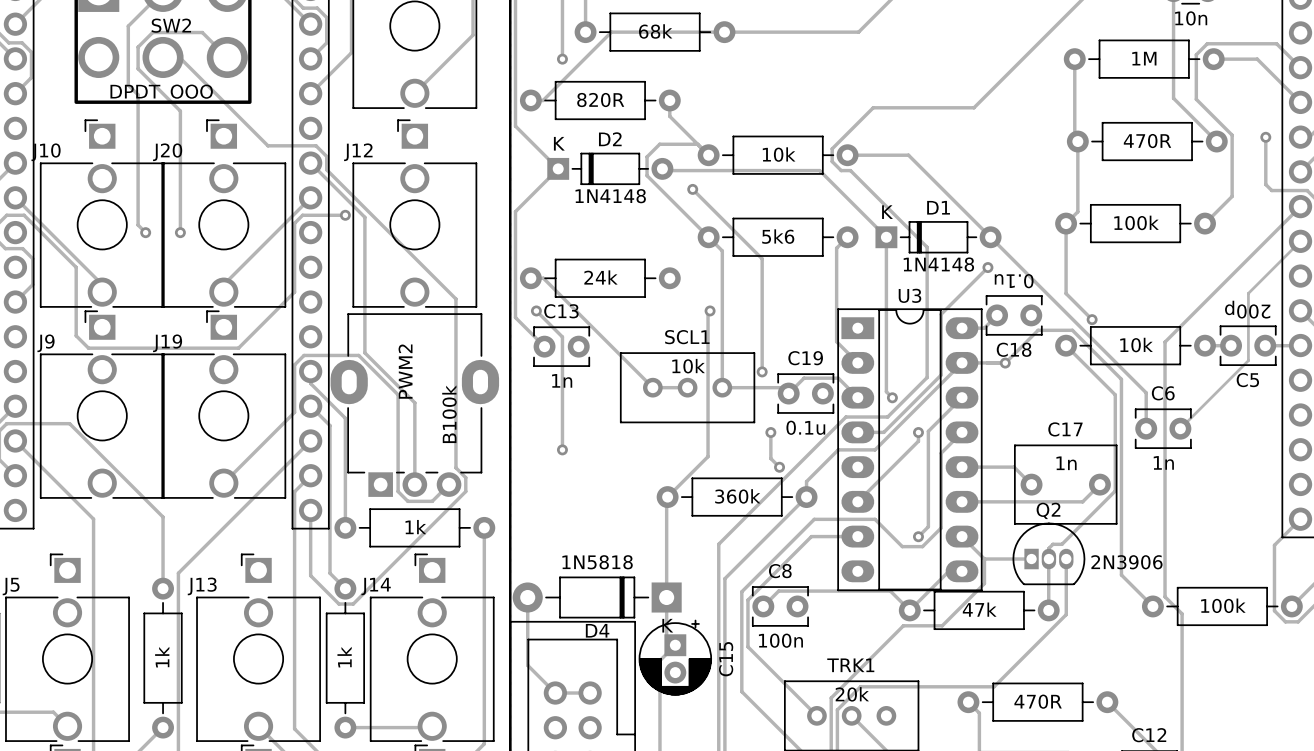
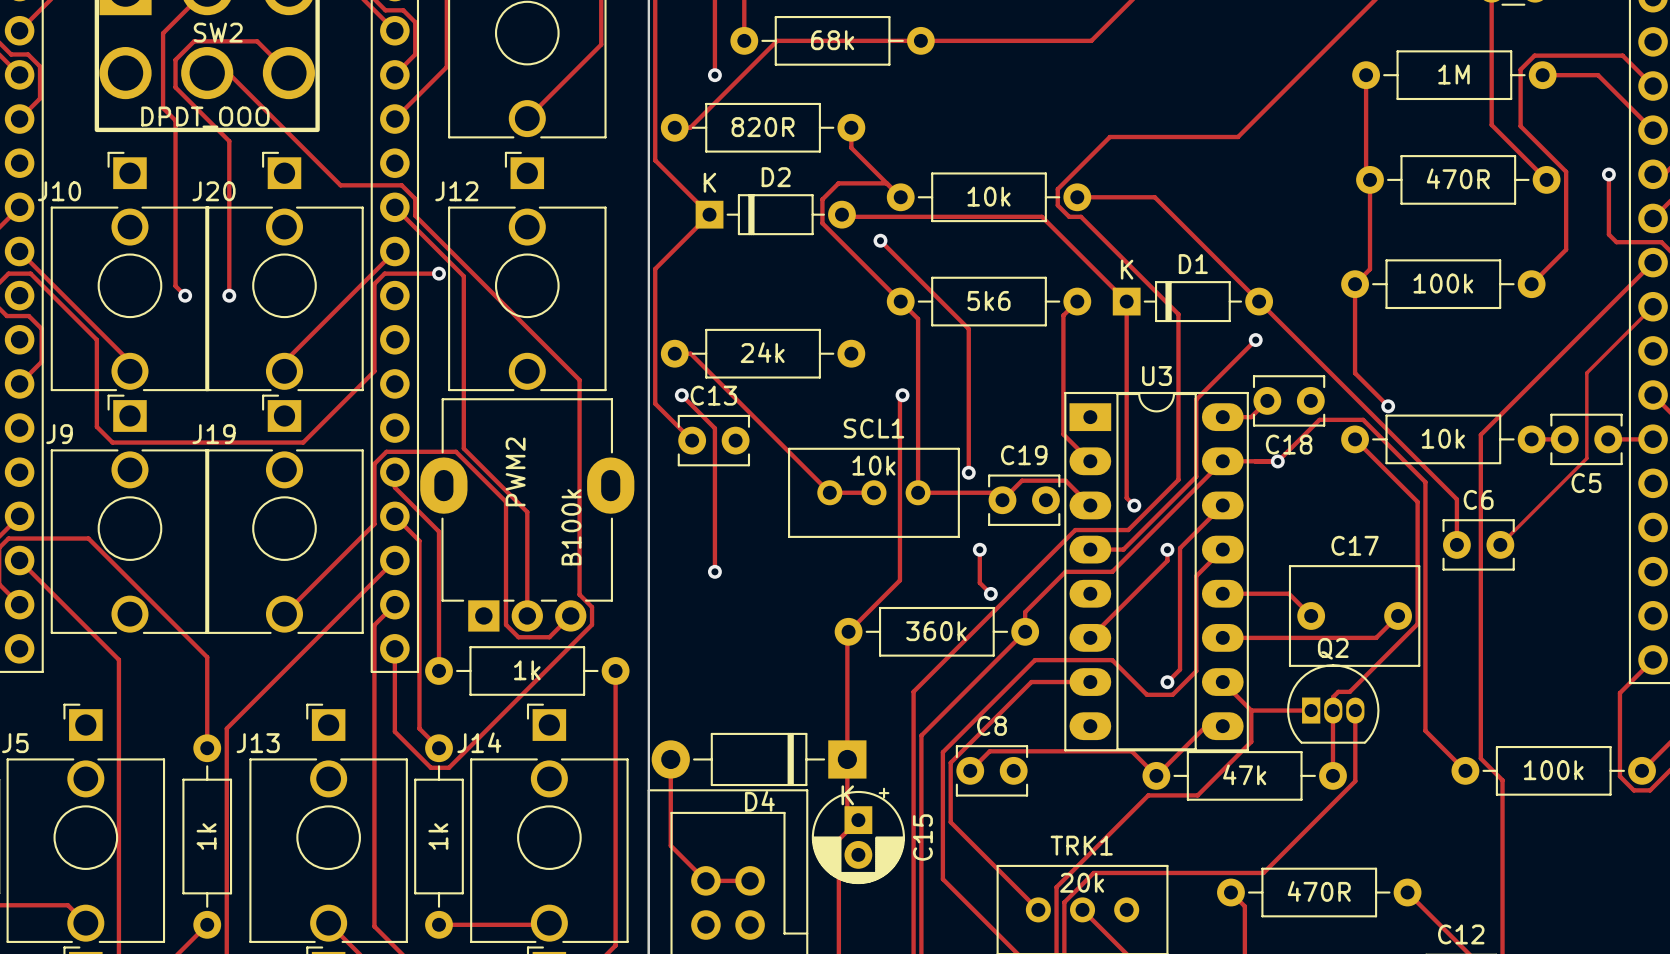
part value: 10n (1191, 18) -> none
D2 value: 1N4148 (610, 196) -> none
D1 value: 1N4148 (938, 264) -> none
C18 value: 0.1u (1014, 281) -> none
C5 value: 200p (1247, 309) -> none
C13 value: 1n (562, 380) -> none
C19 value: 0.1u (805, 427) -> none
C6 value: 1n (1163, 462) -> none
C17 value: 1n (1066, 463) -> none
D4 value: 1N5818 (597, 562) -> none
Q2 value: 2N3906 (1126, 562) -> none
C8 value: 100n (780, 640) -> none

